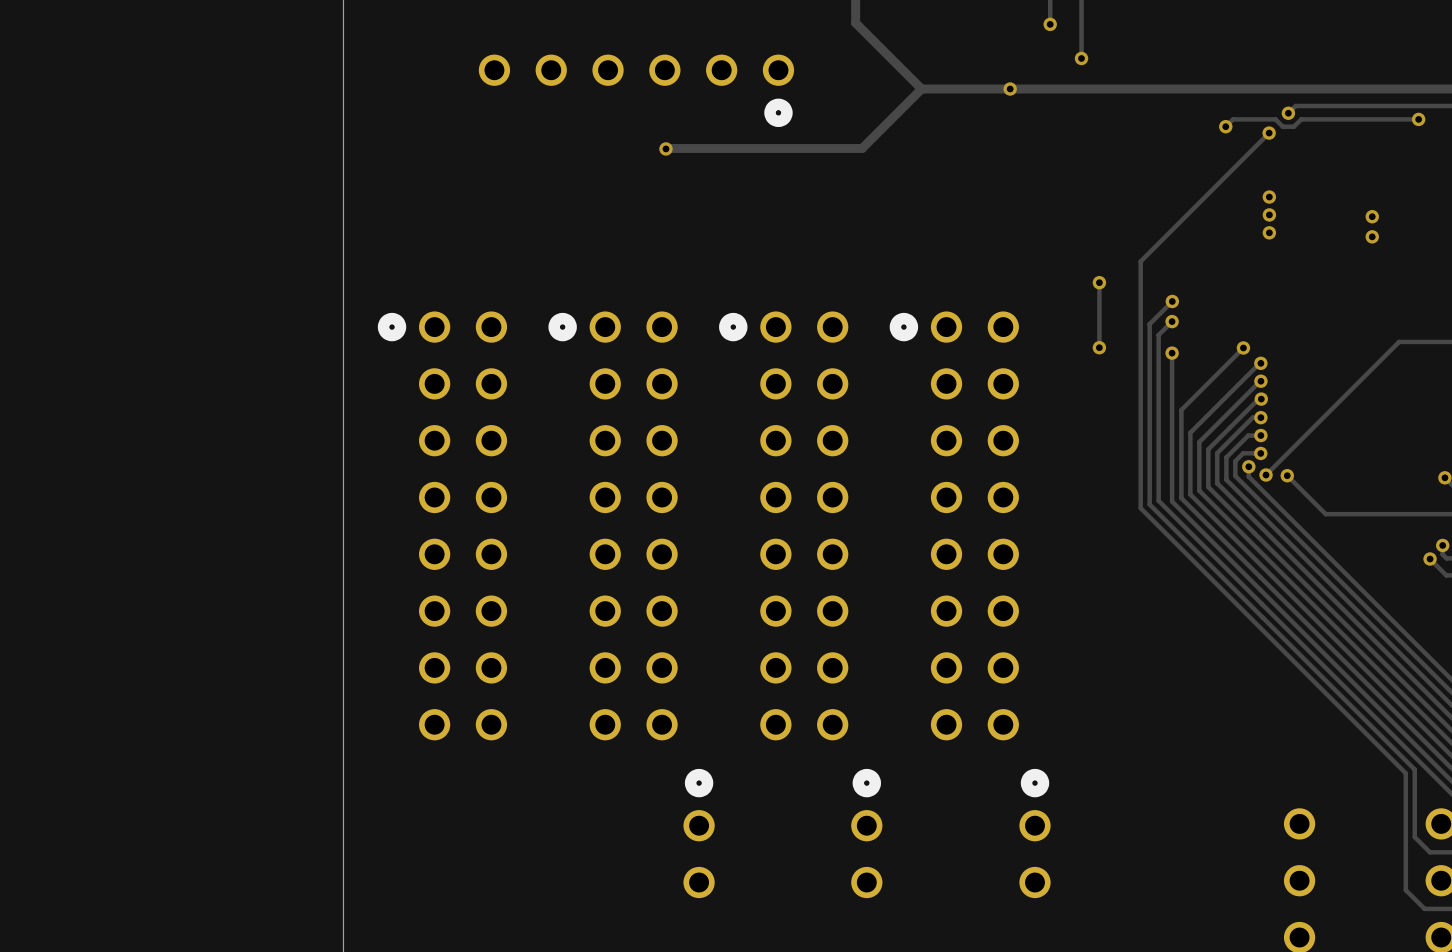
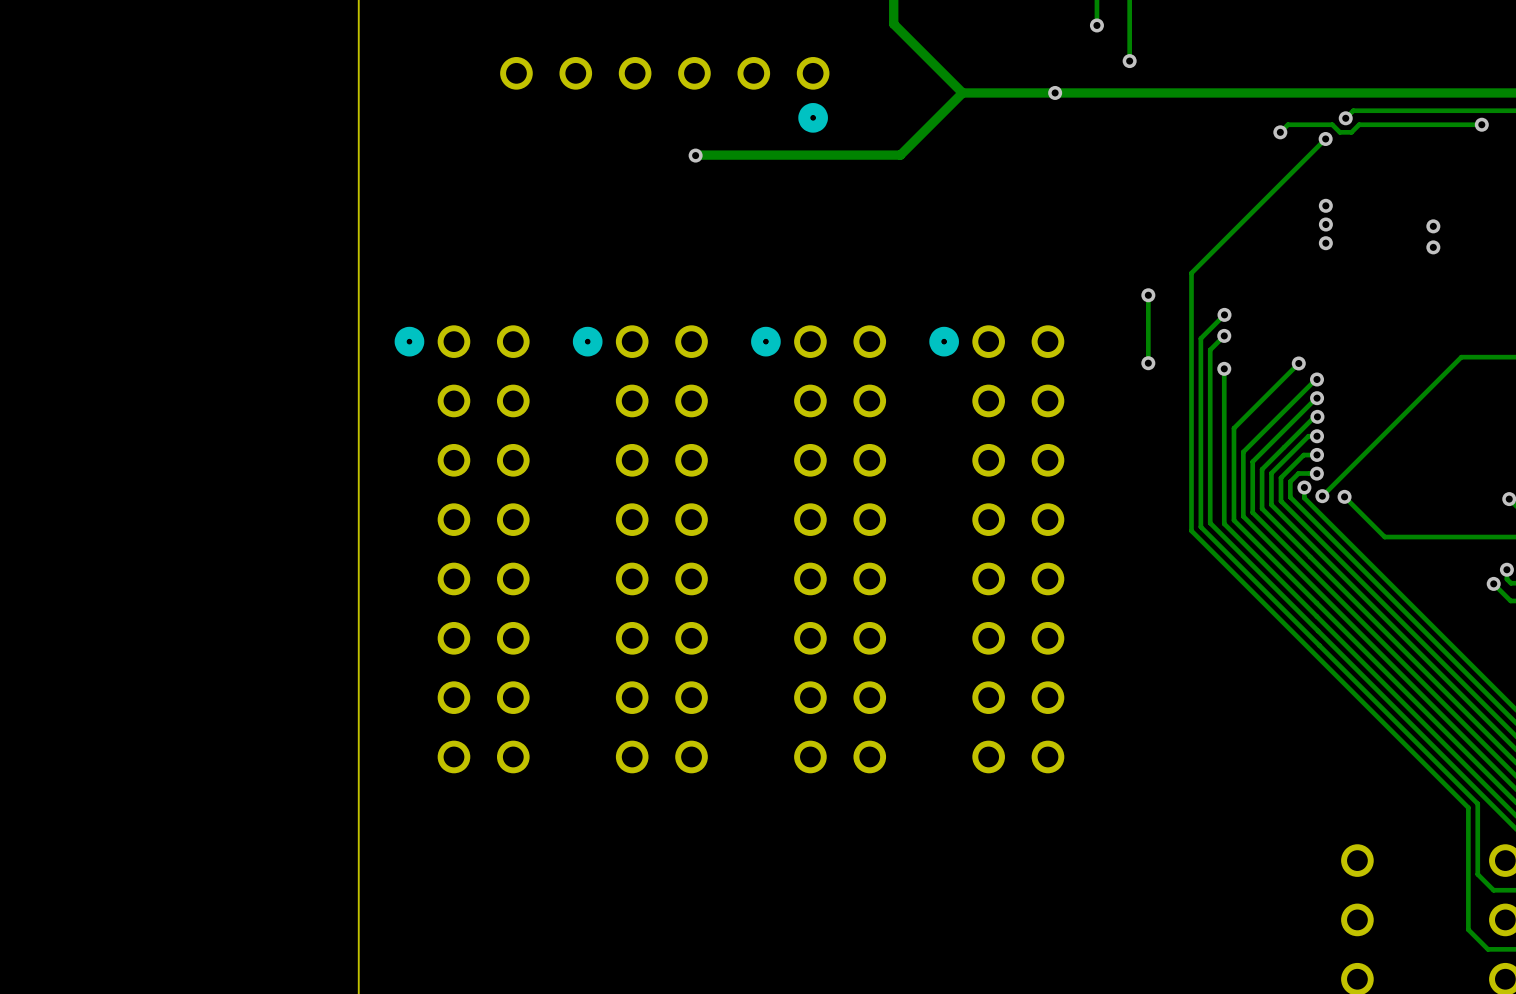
part: (699, 833) -> none
part: (866, 833) -> none
part: (1035, 833) -> none

